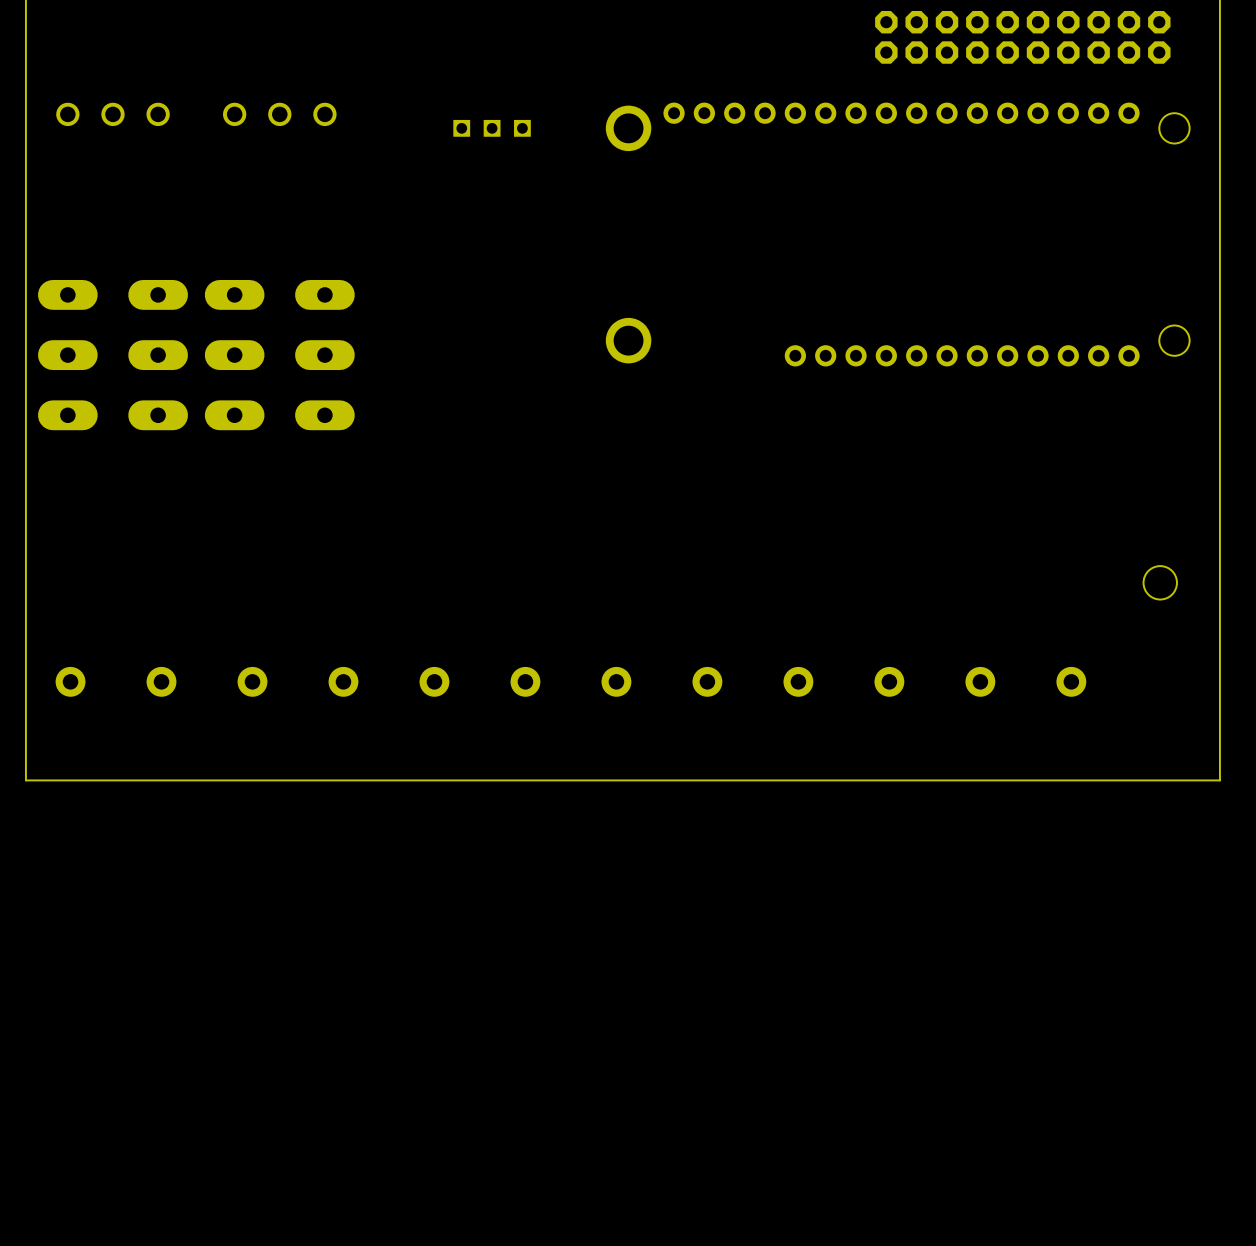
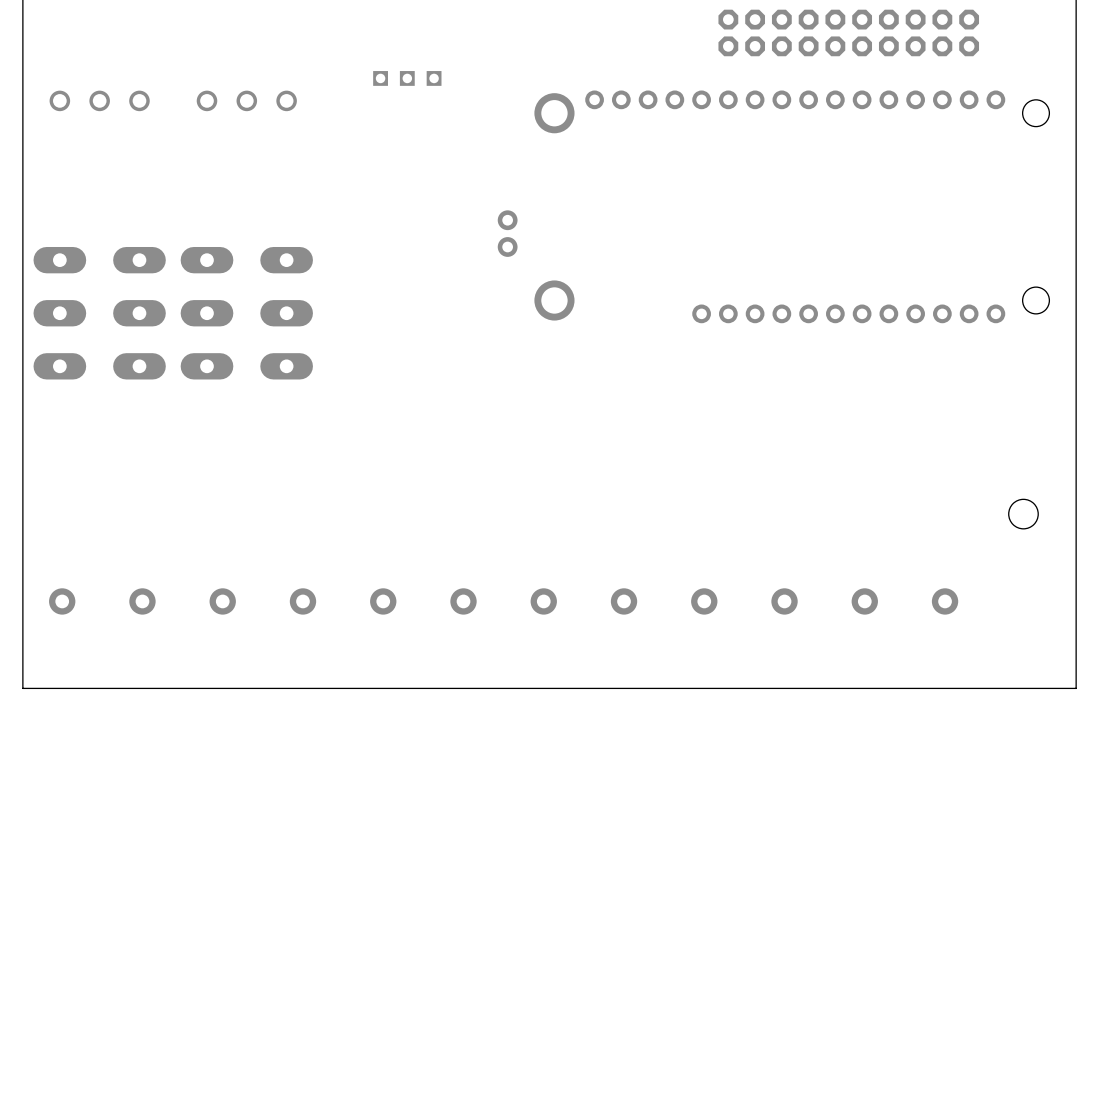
part position: (1022, 37) -> (848, 32)
part position: (492, 128) -> (407, 78)
part: none -> (507, 233)

